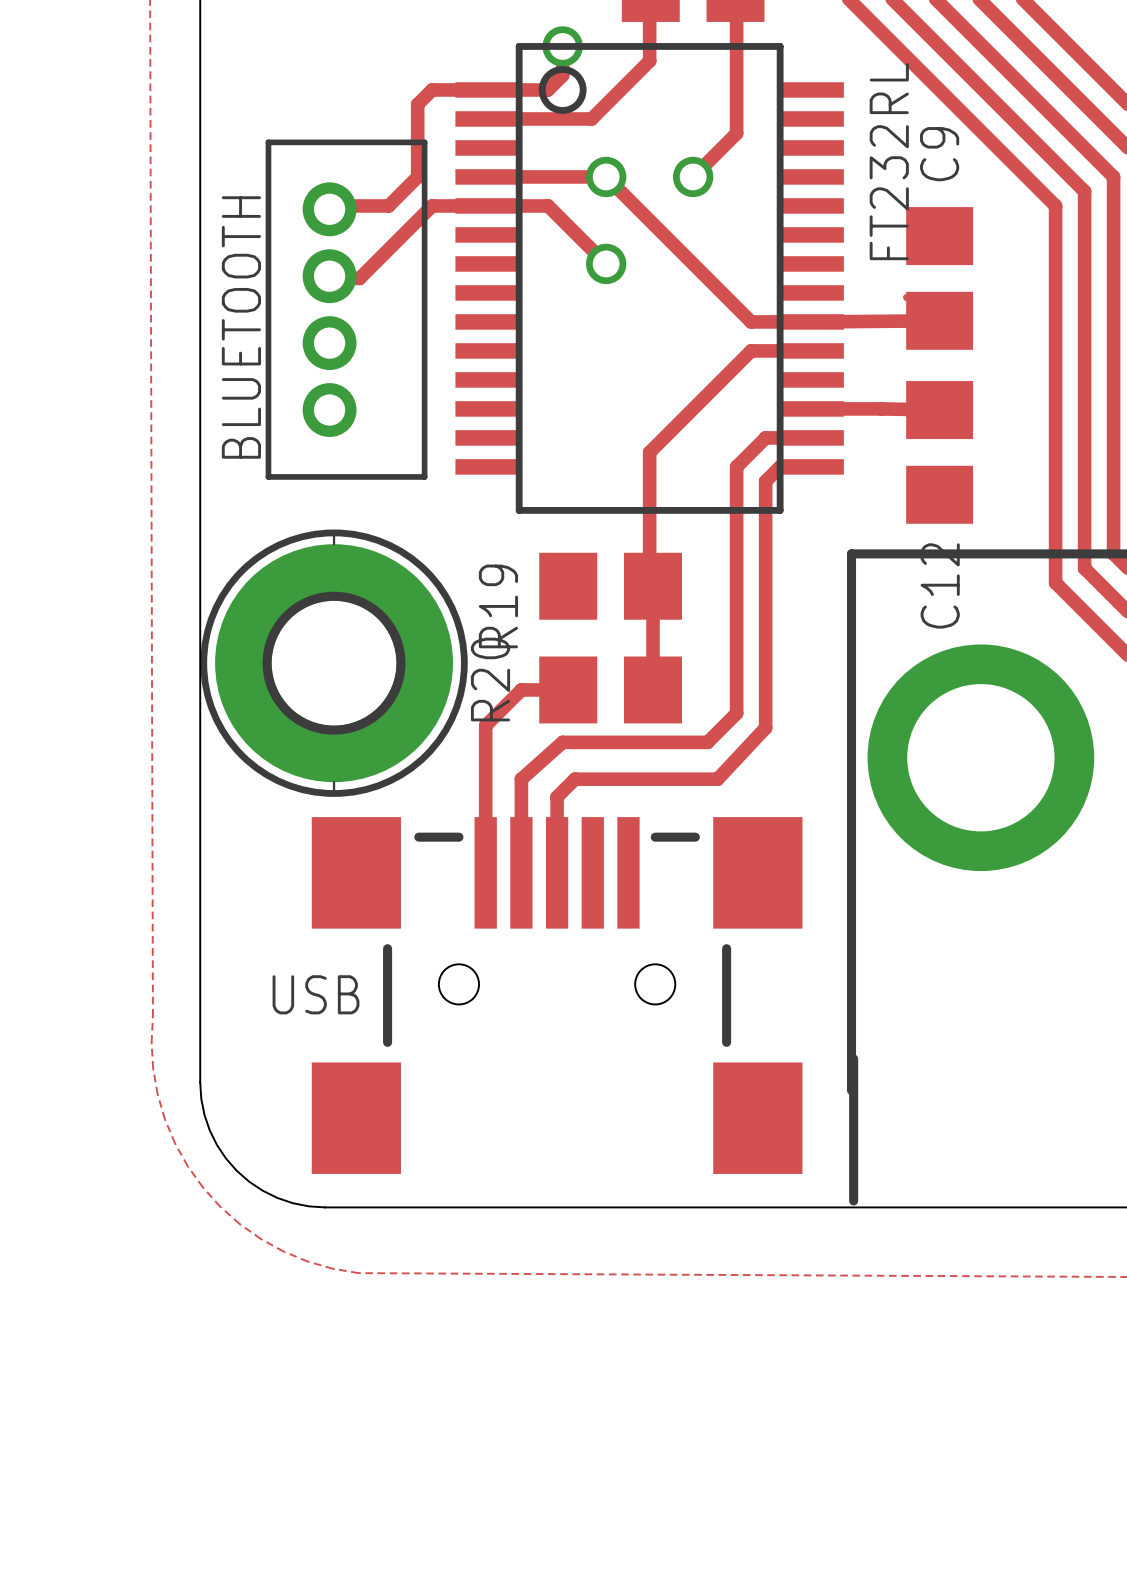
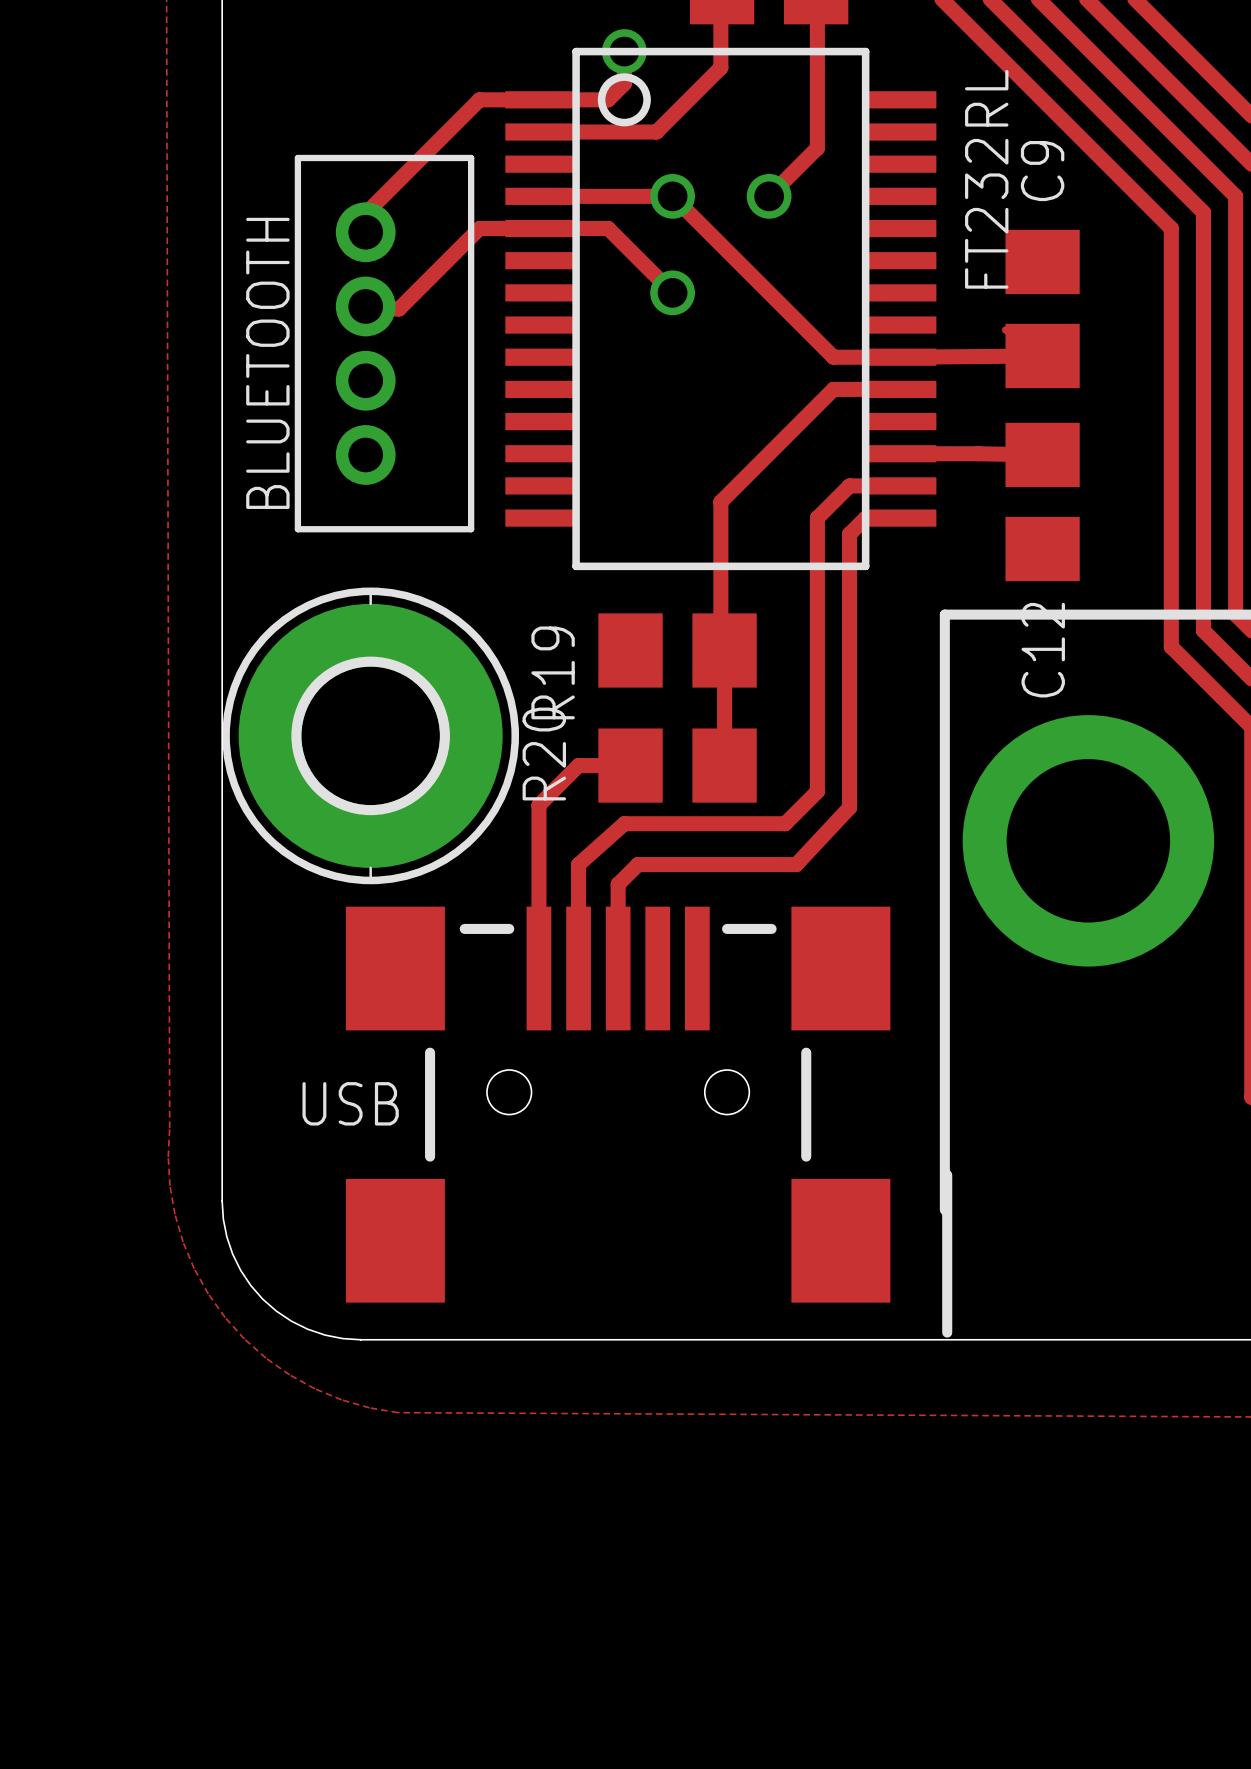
track: (417, 104) (417, 176) (388, 205) (330, 205) (329, 209) -> (463, 115) (366, 212) (365, 232)

